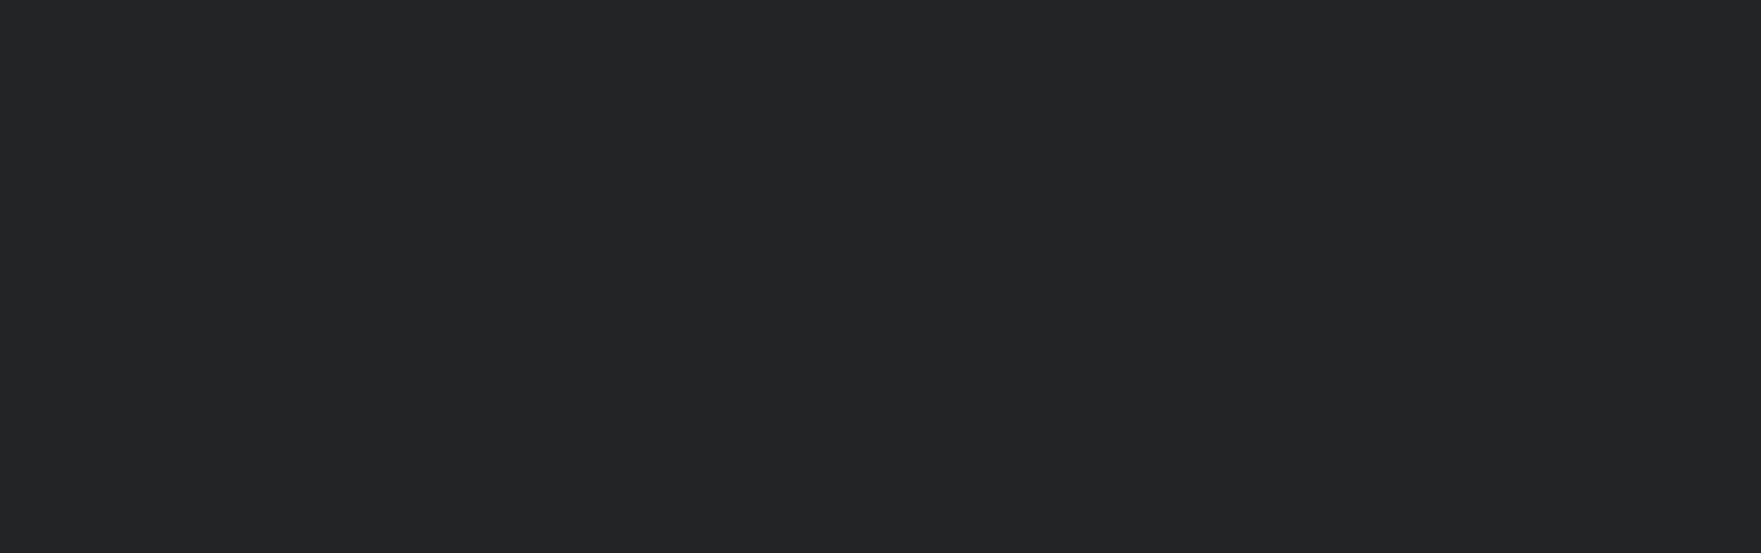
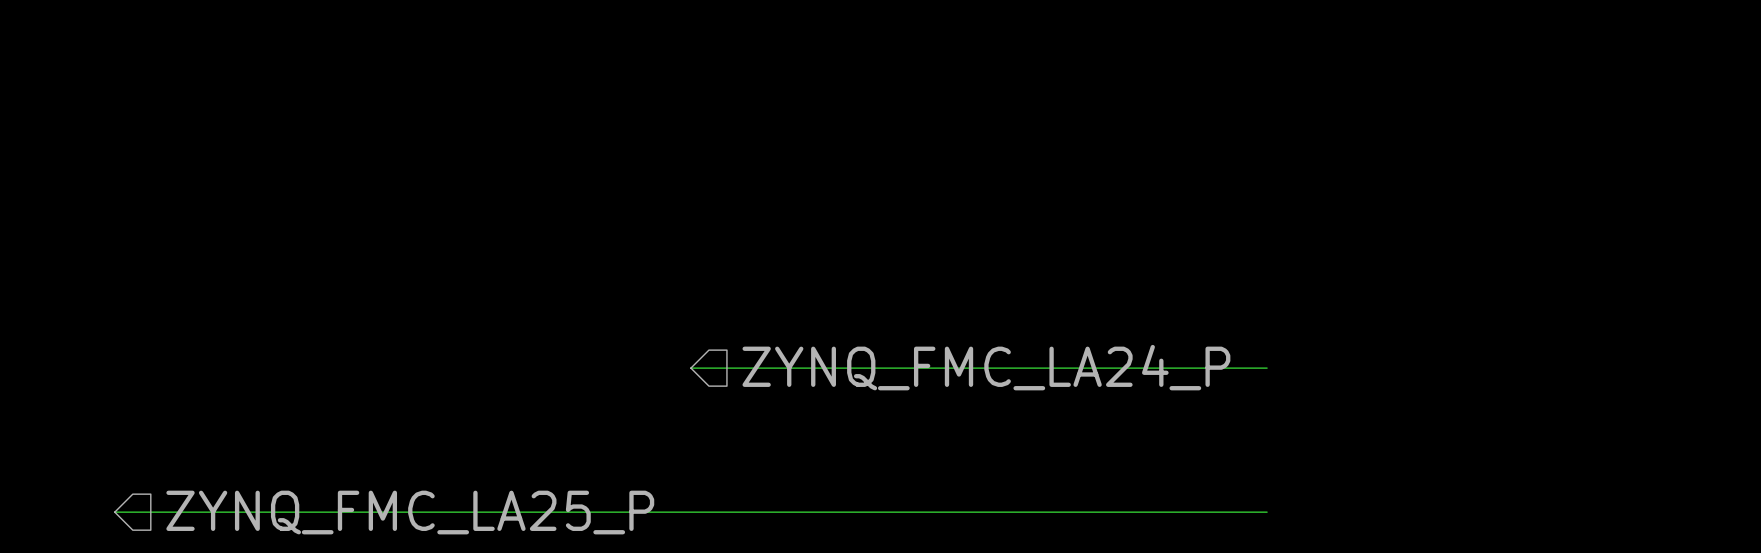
hierarchical label: none -> ZYNQ_FMC_LA24_P (986, 367)
wire: none -> (690, 368) (1267, 368)
wire: none -> (114, 512) (1267, 512)
hierarchical label: none -> ZYNQ_FMC_LA25_P (410, 512)

